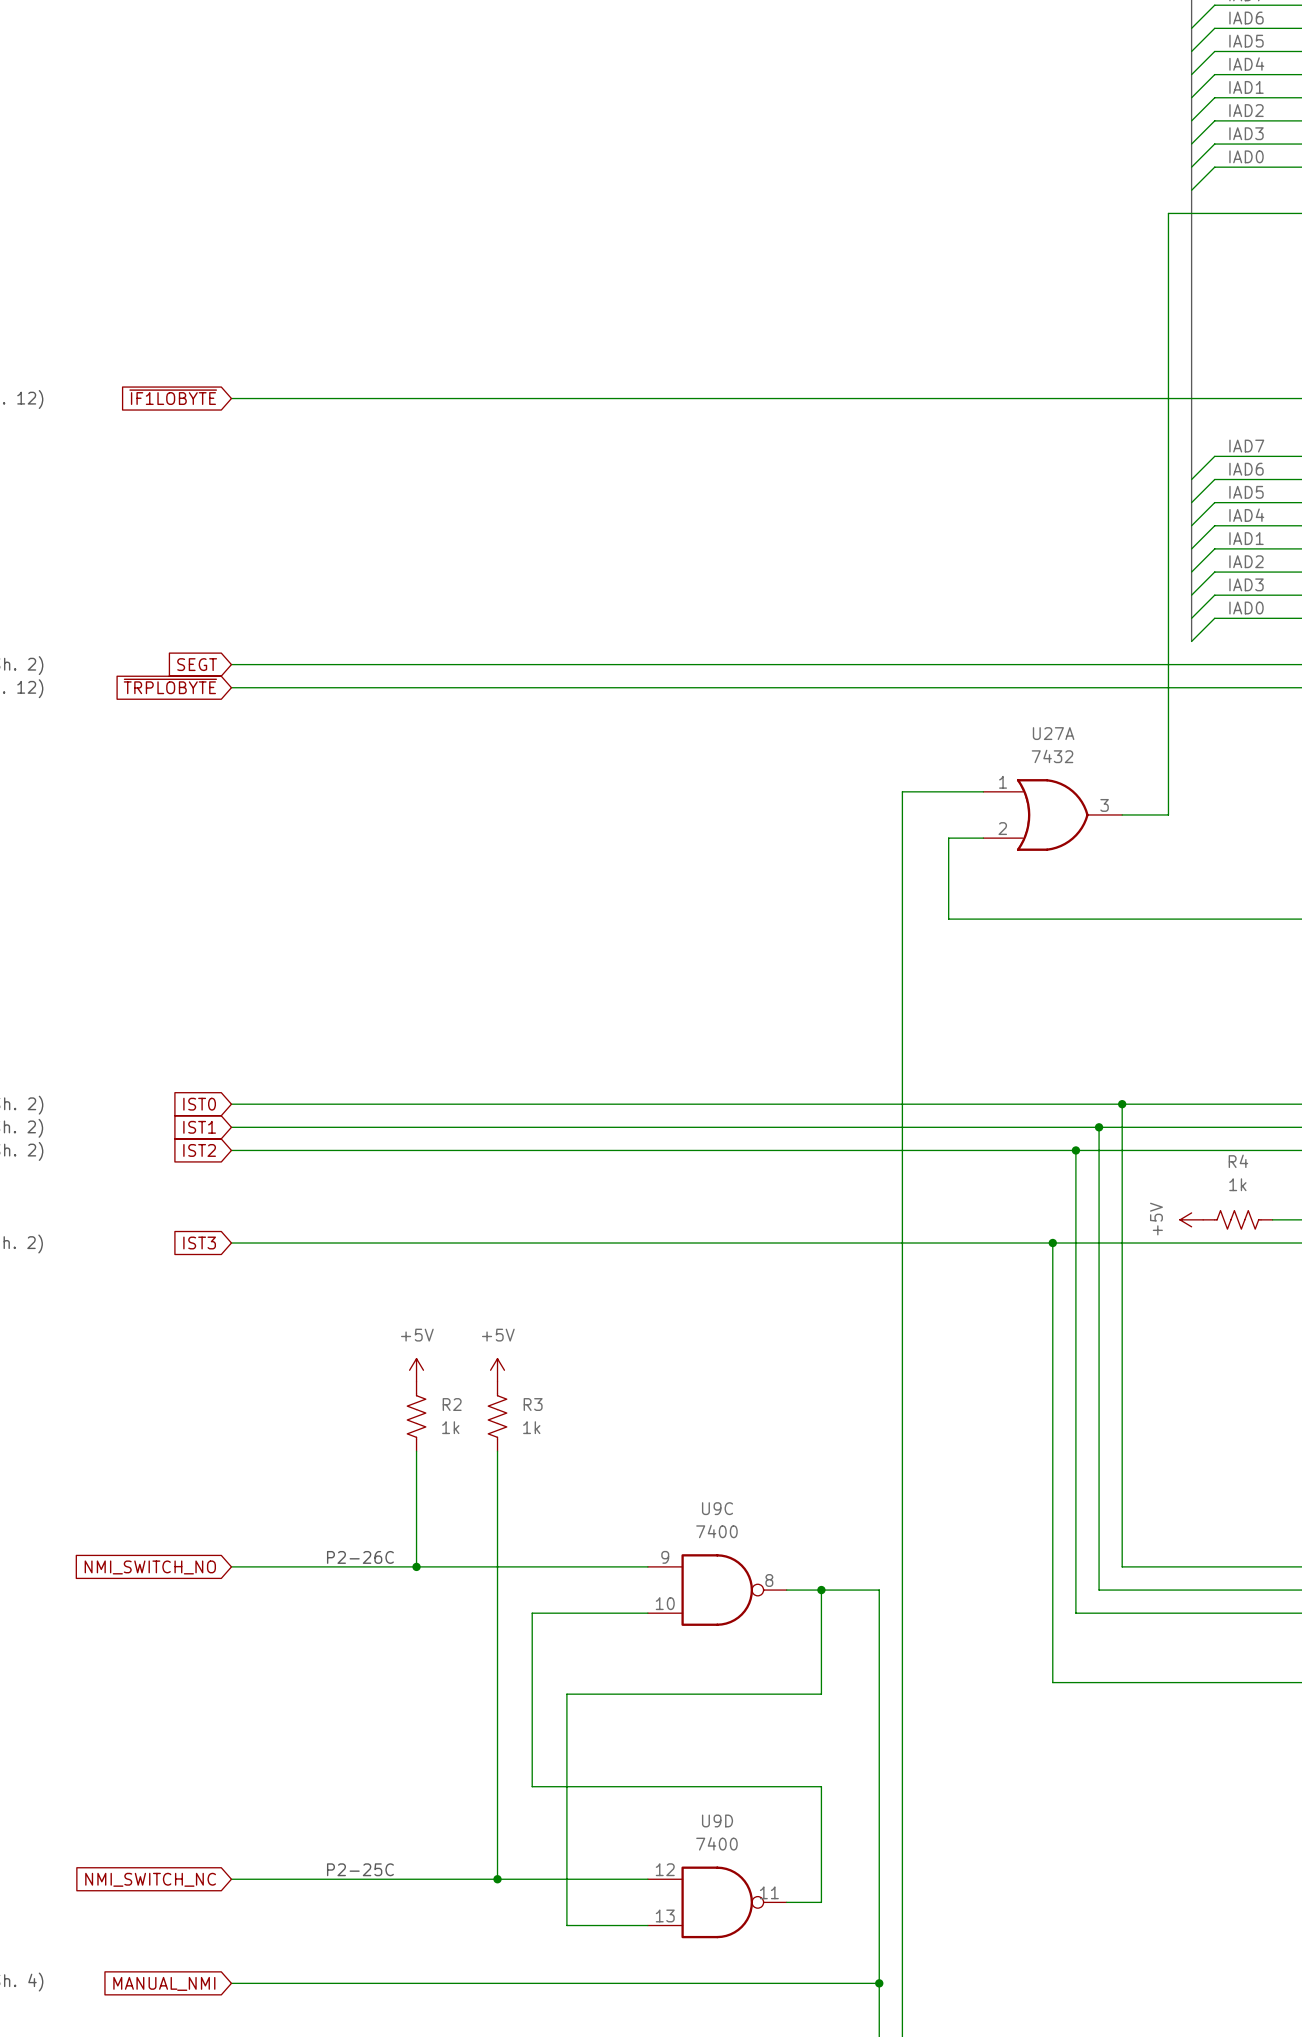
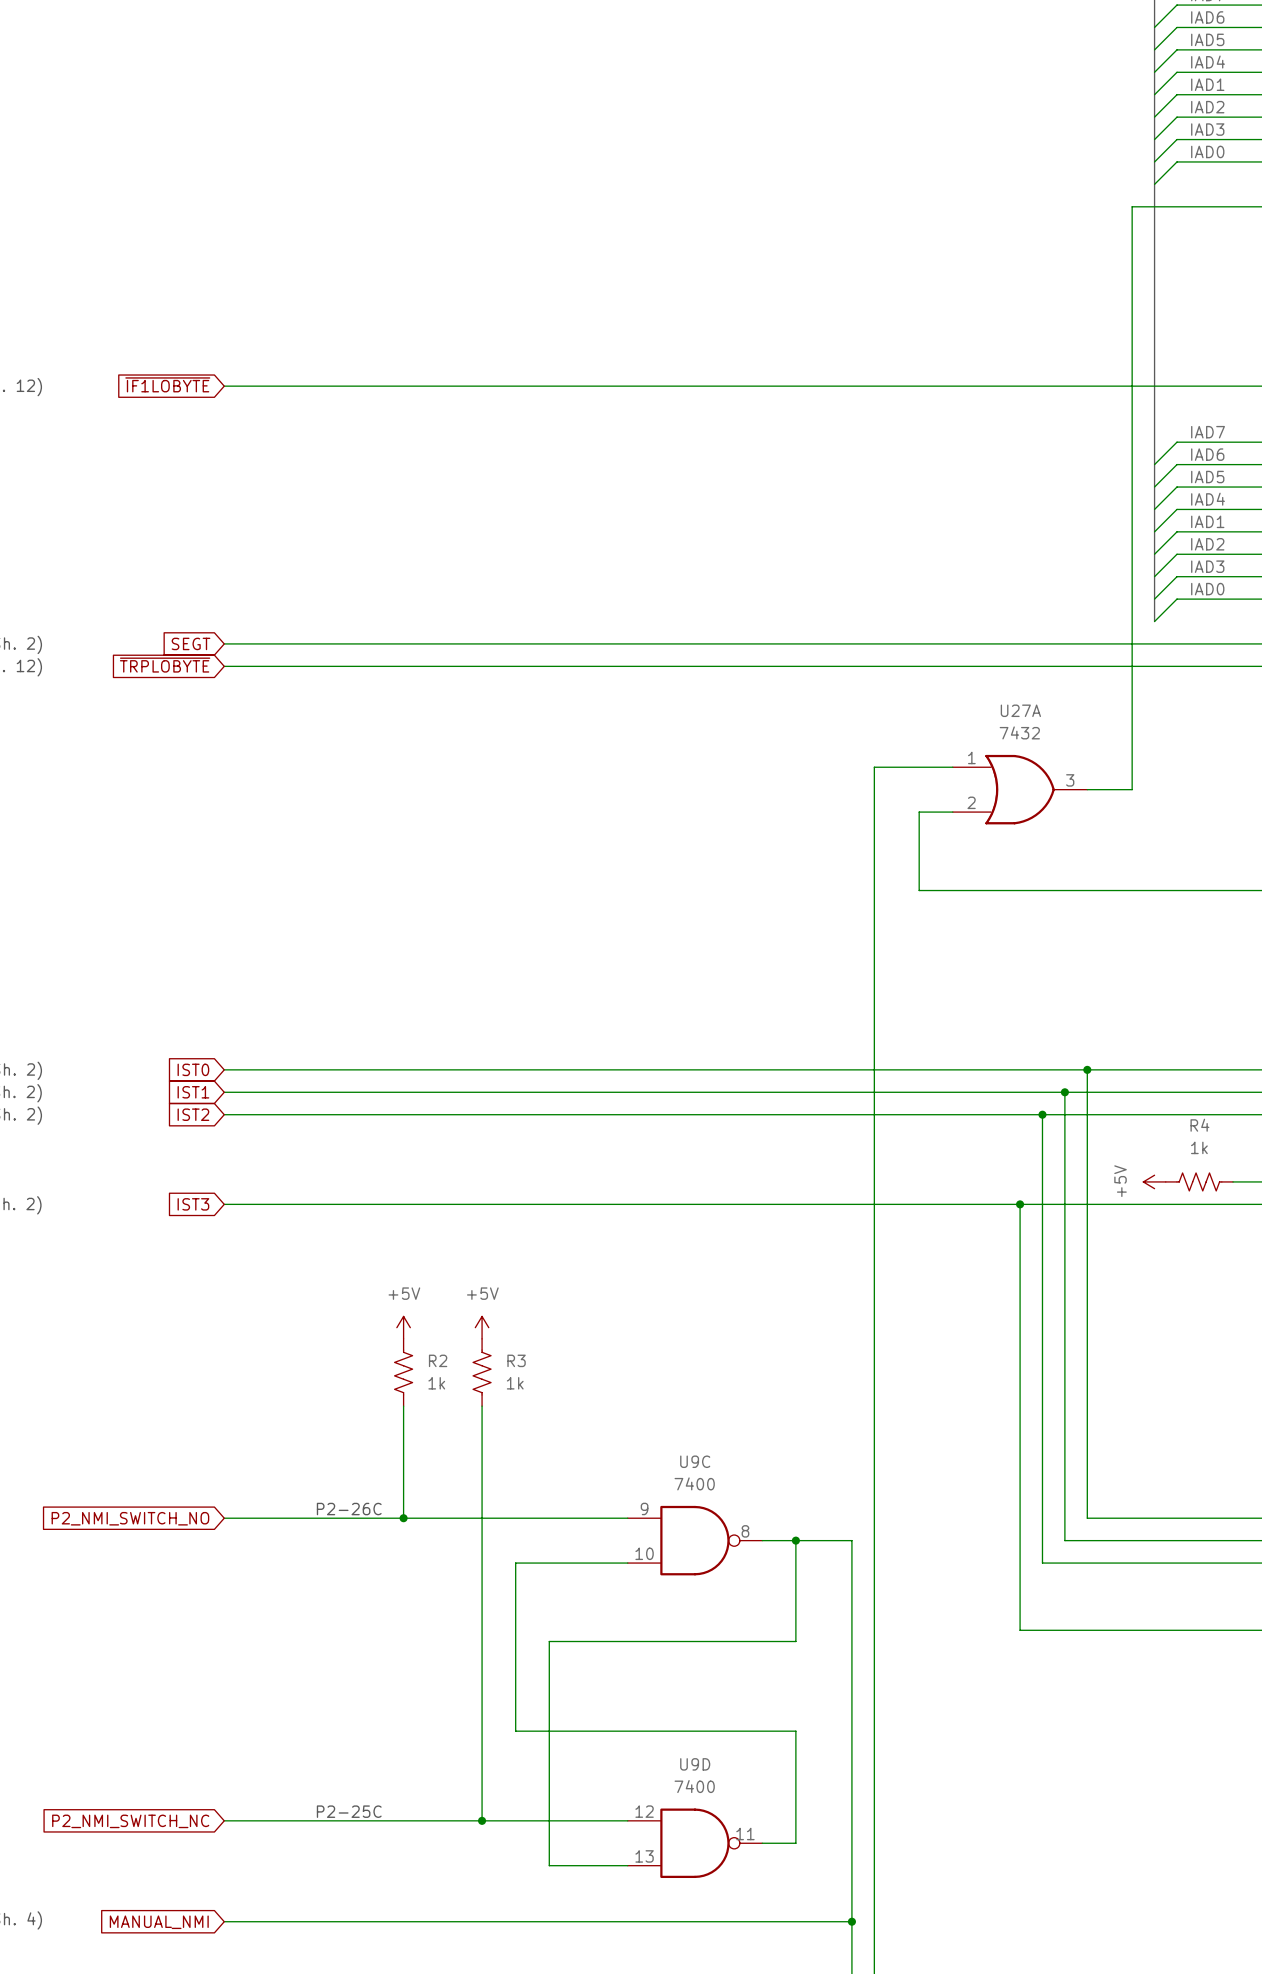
global label: NMI_SWITCH_NO (150, 1567) -> P2_NMI_SWITCH_NO (130, 1518)
global label: NMI_SWITCH_NC (150, 1879) -> P2_NMI_SWITCH_NC (130, 1821)

